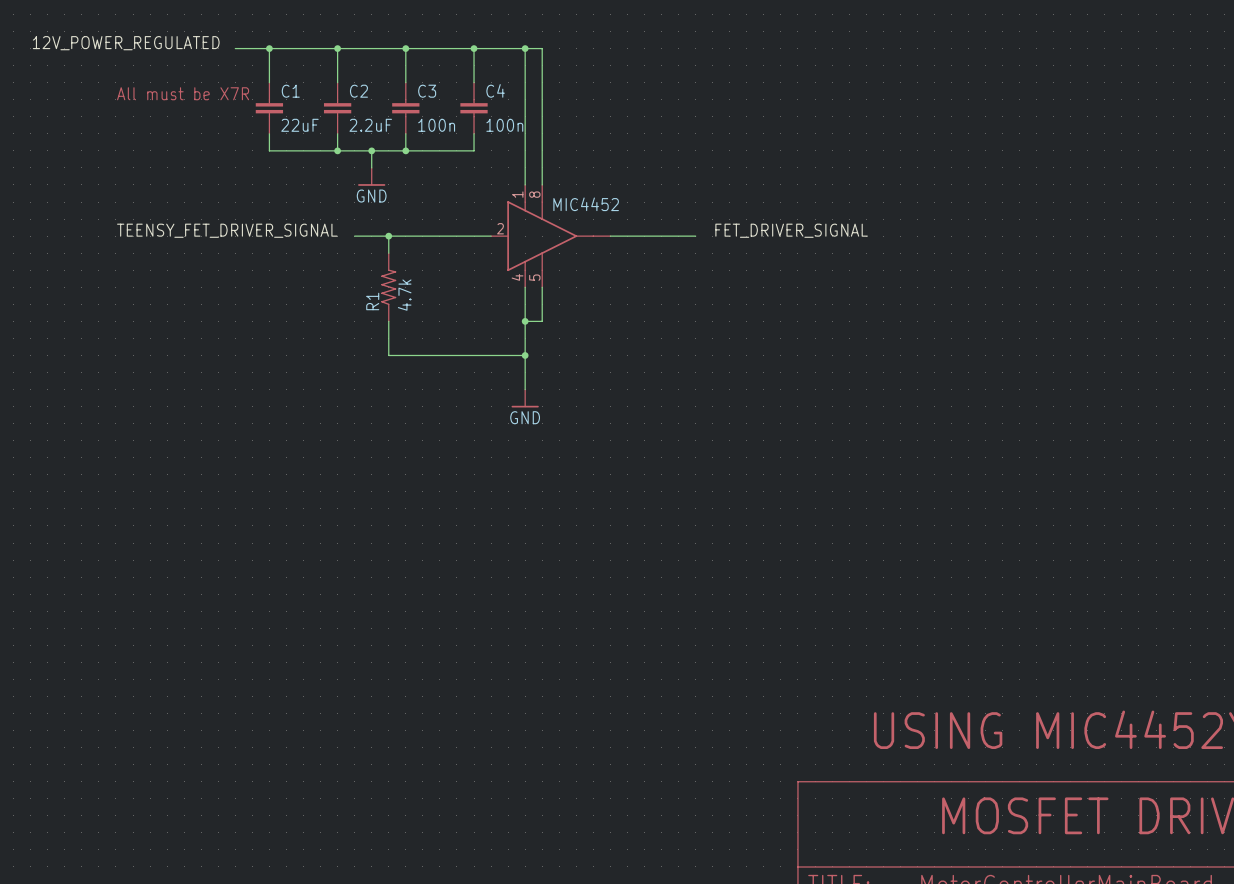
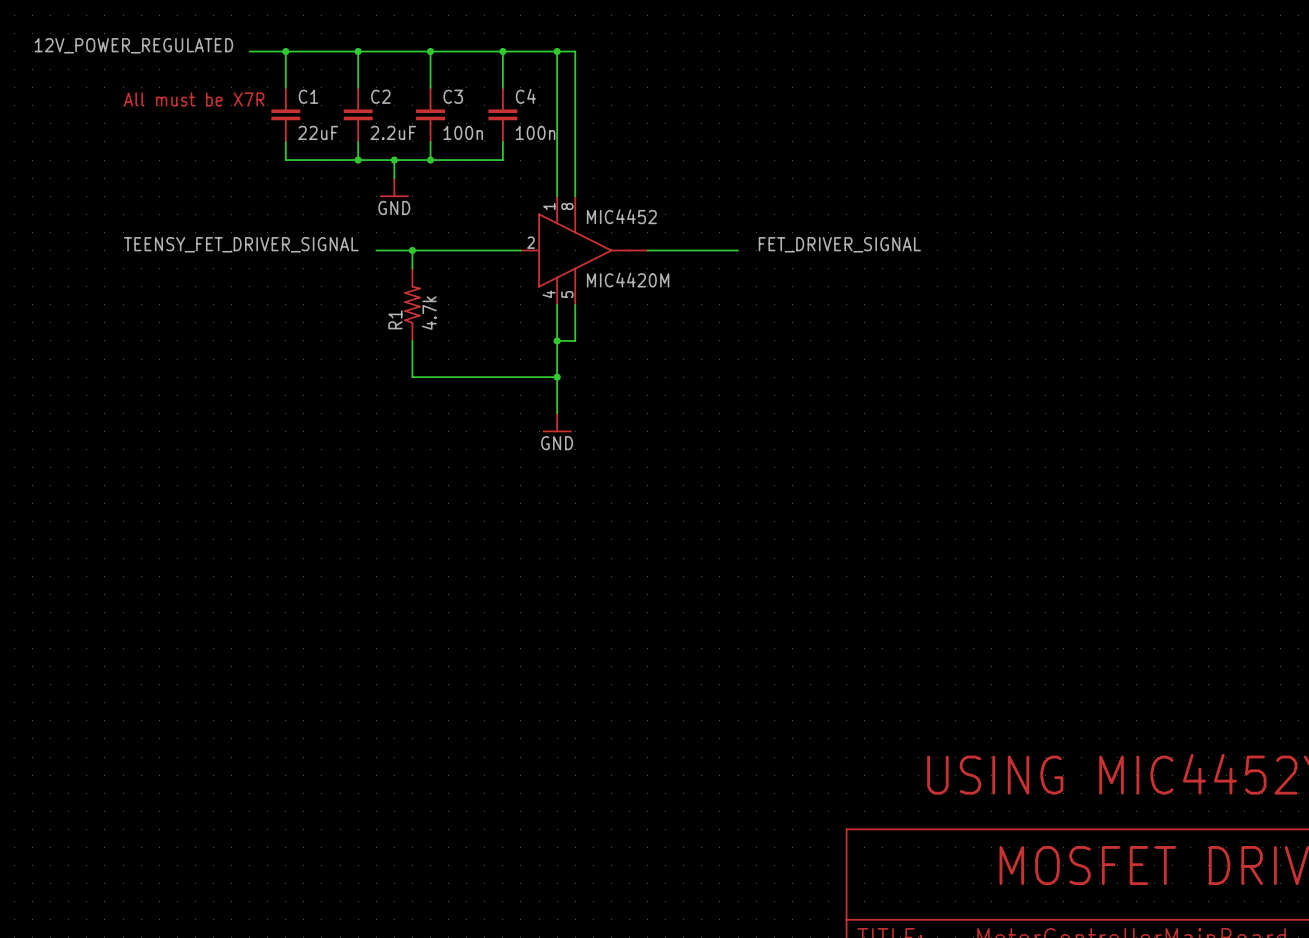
MIC4452 value: none -> MIC4420M (628, 280)

